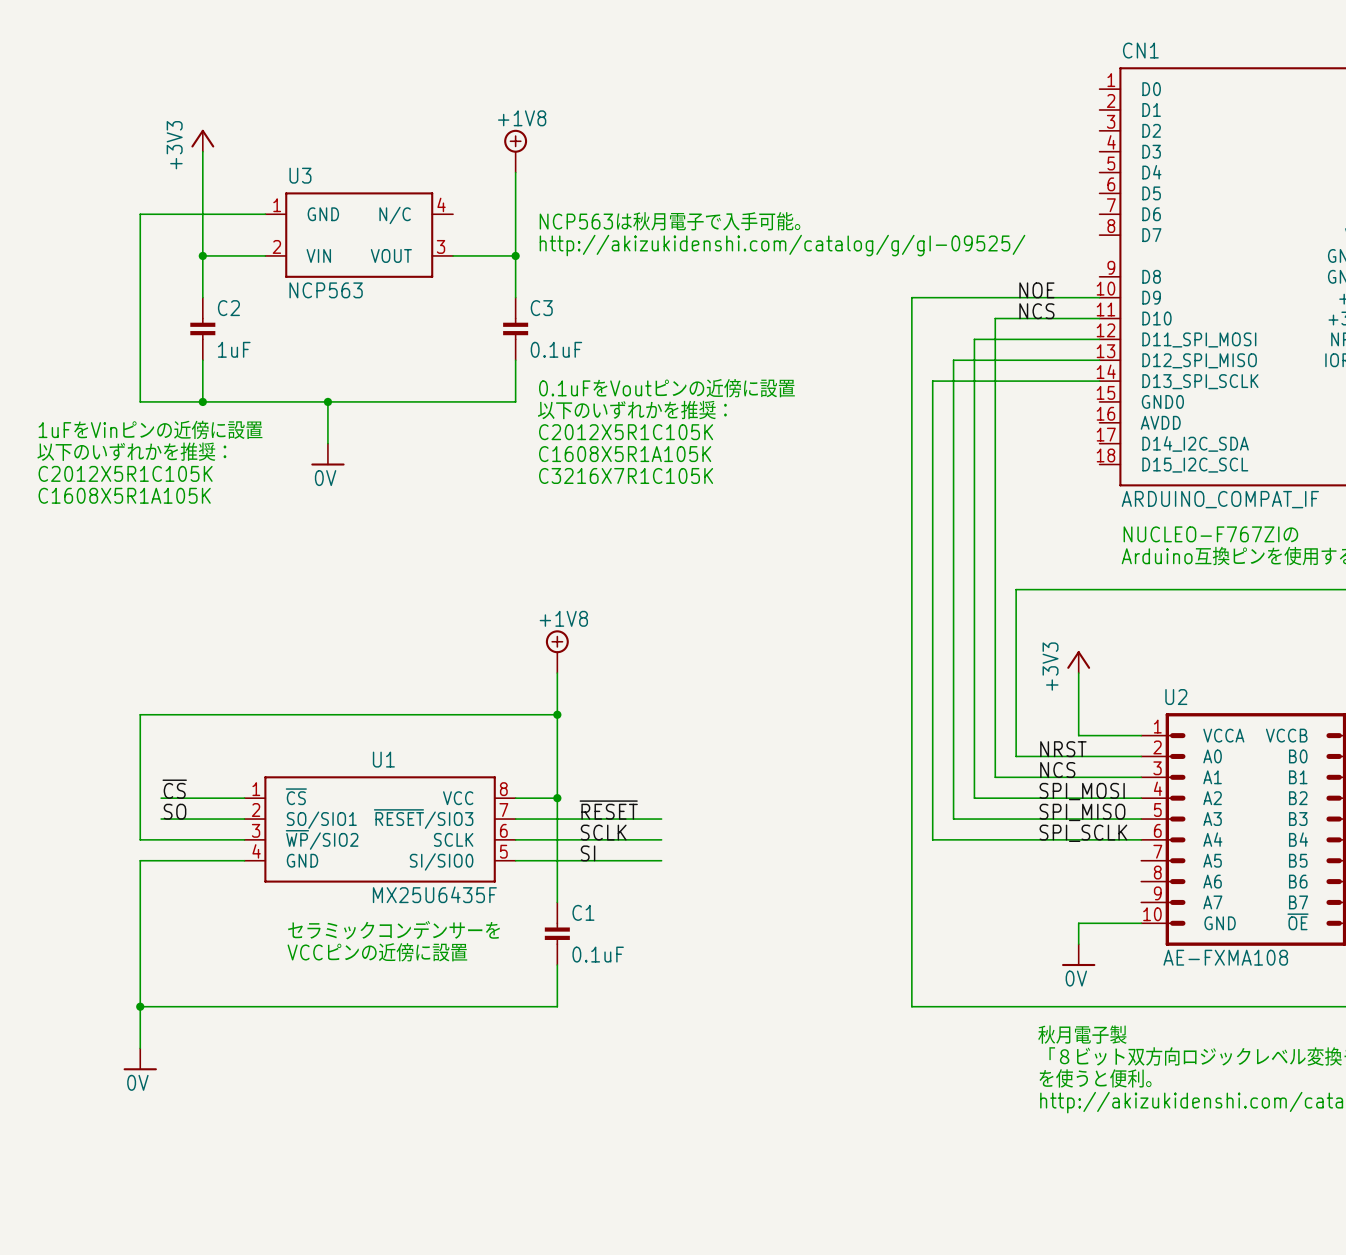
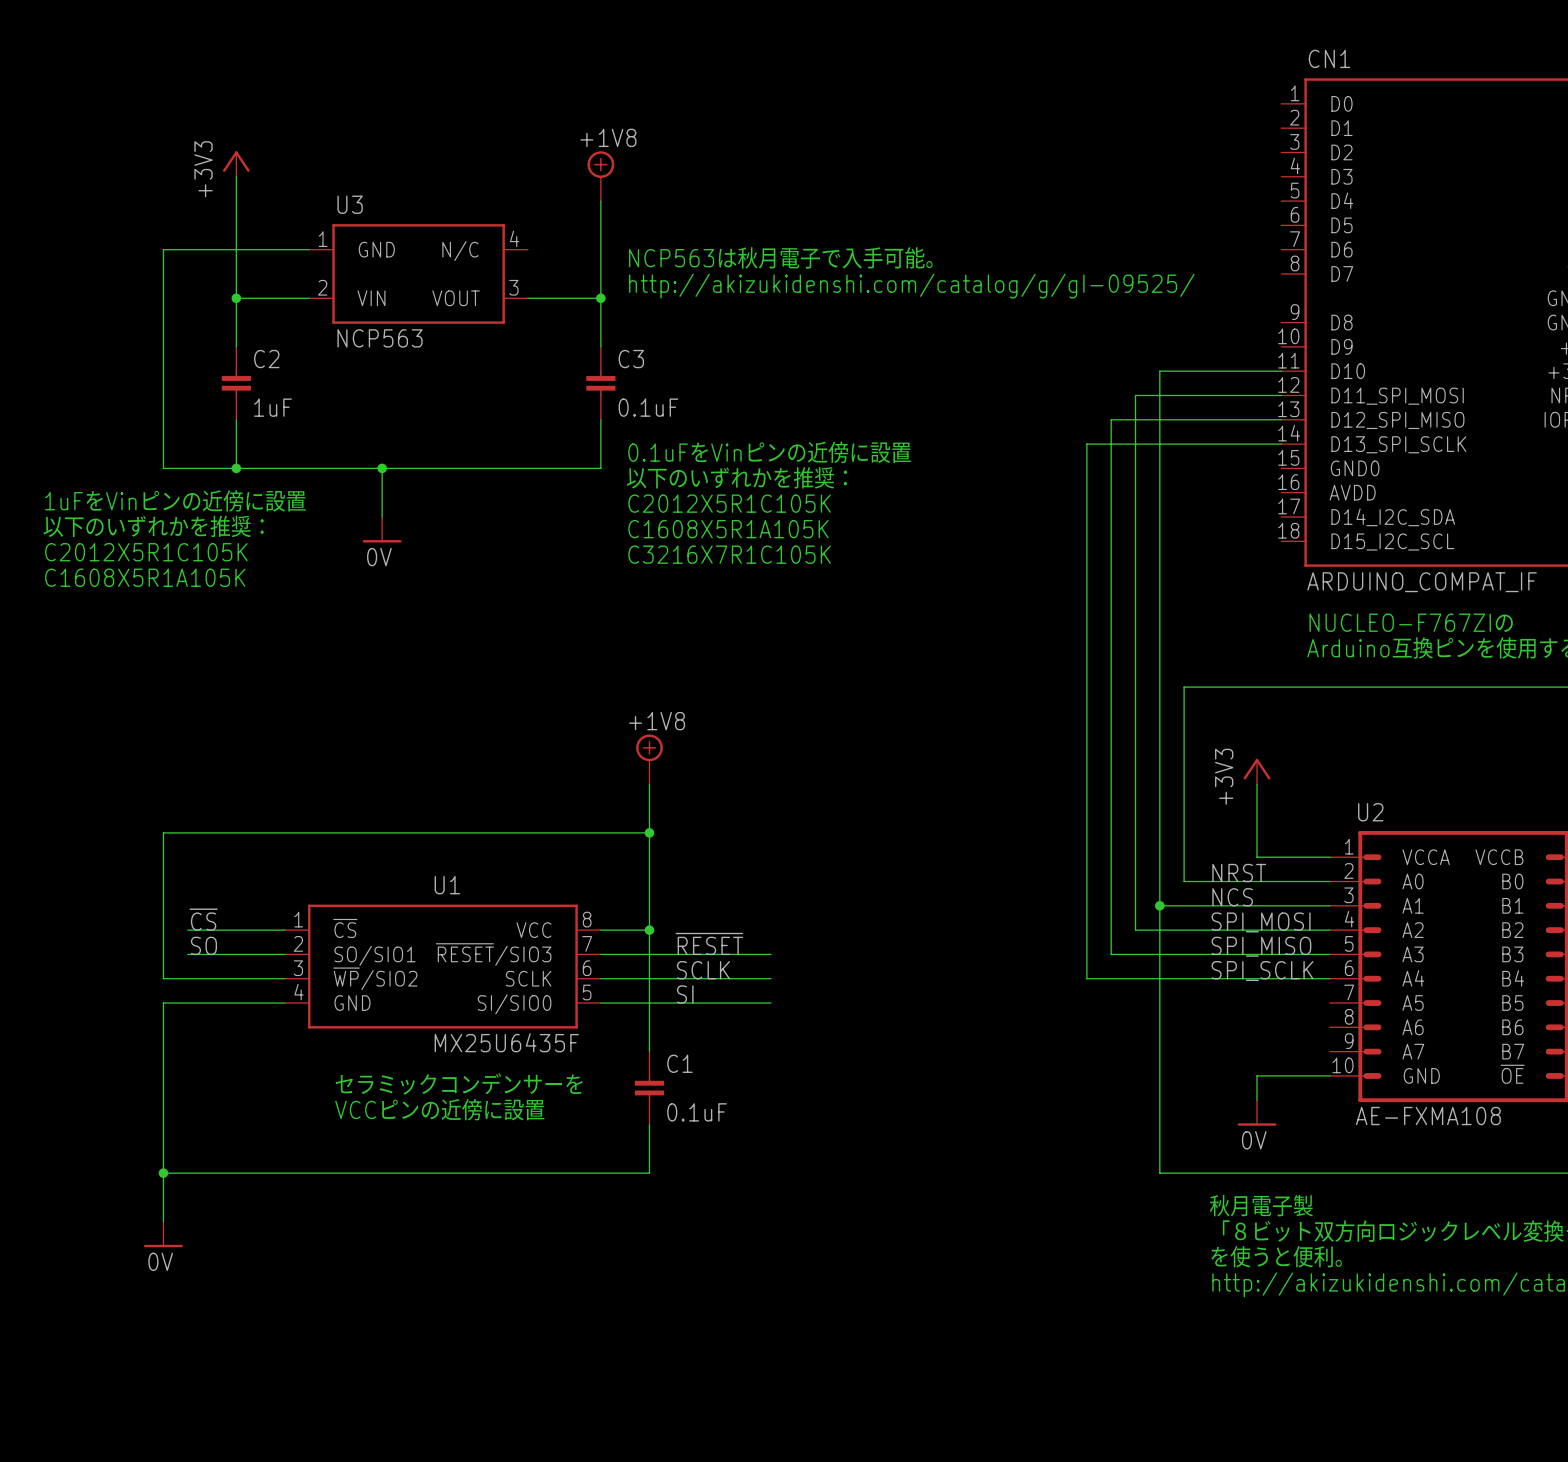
label: NOE (1036, 290) -> none
wire: (1099, 297) (911, 297) (911, 1006) (995, 1006) -> (1159, 905) (1159, 1173)
label: NCS (1036, 311) -> none
text: 0.1uFをVoutピンの近傍に設置 (667, 388) -> 0.1uFをVinピンの近傍に設置 (769, 452)
junction: none -> (1159, 905)

